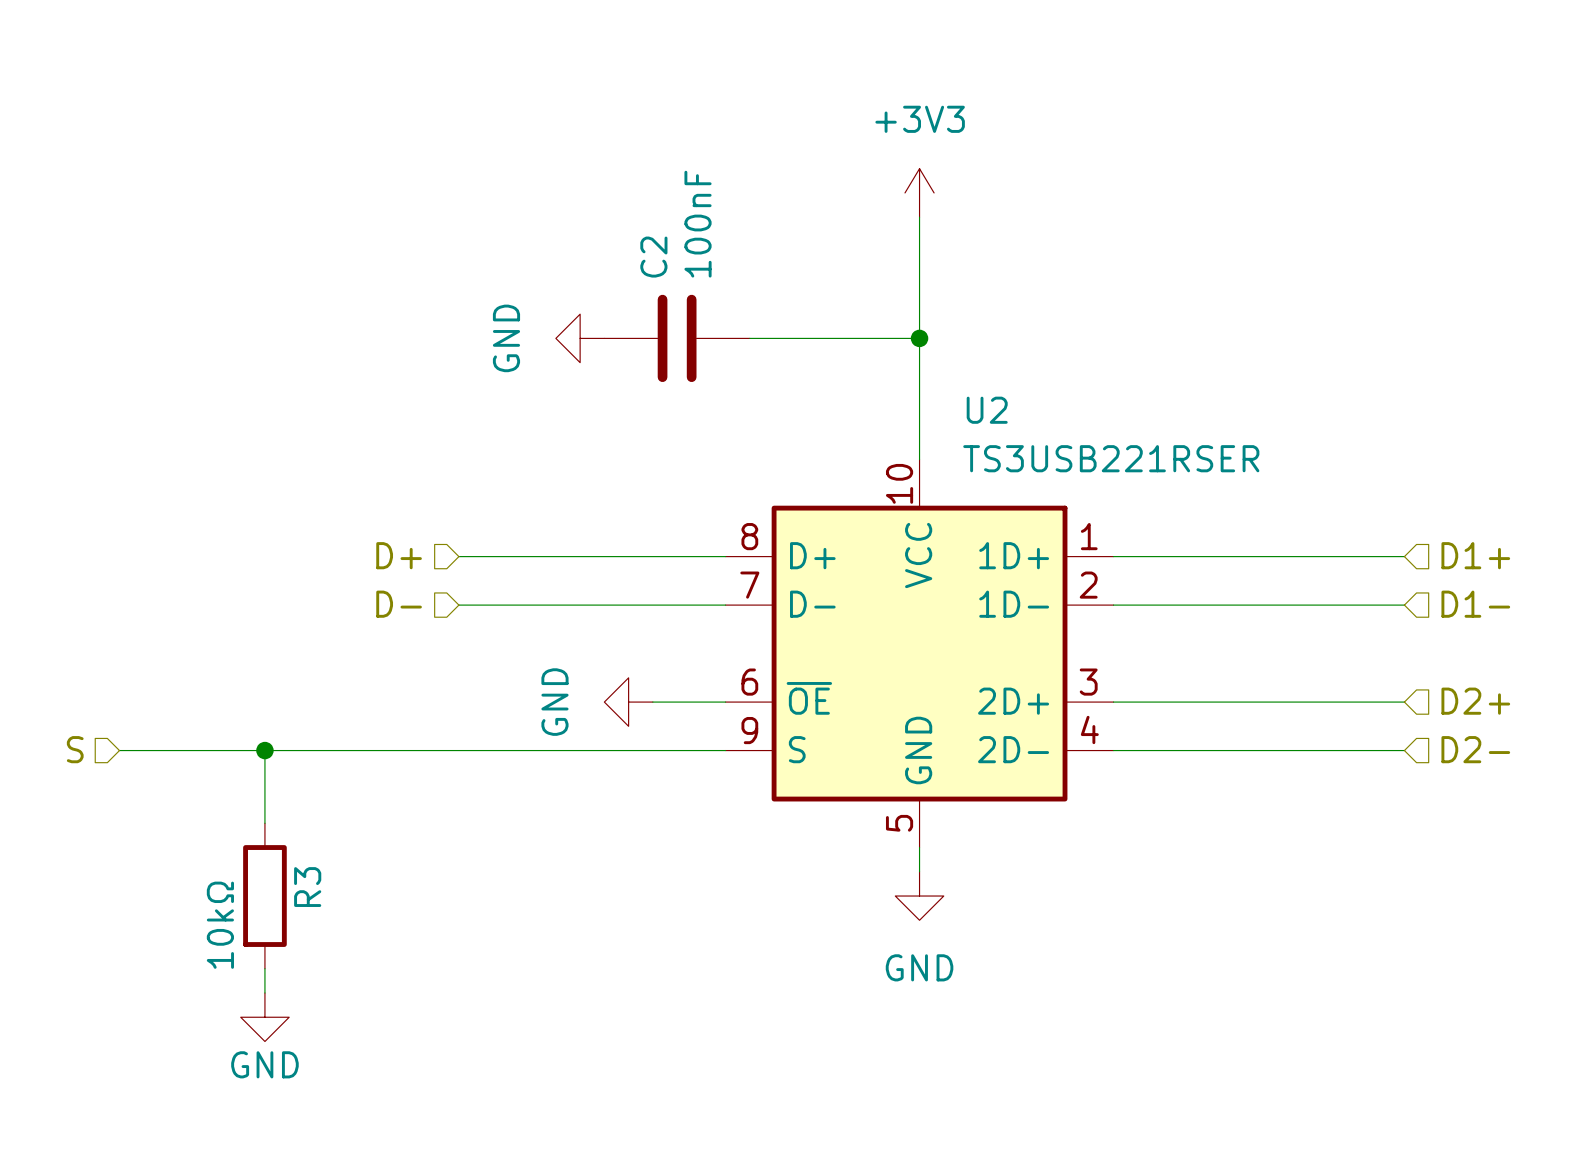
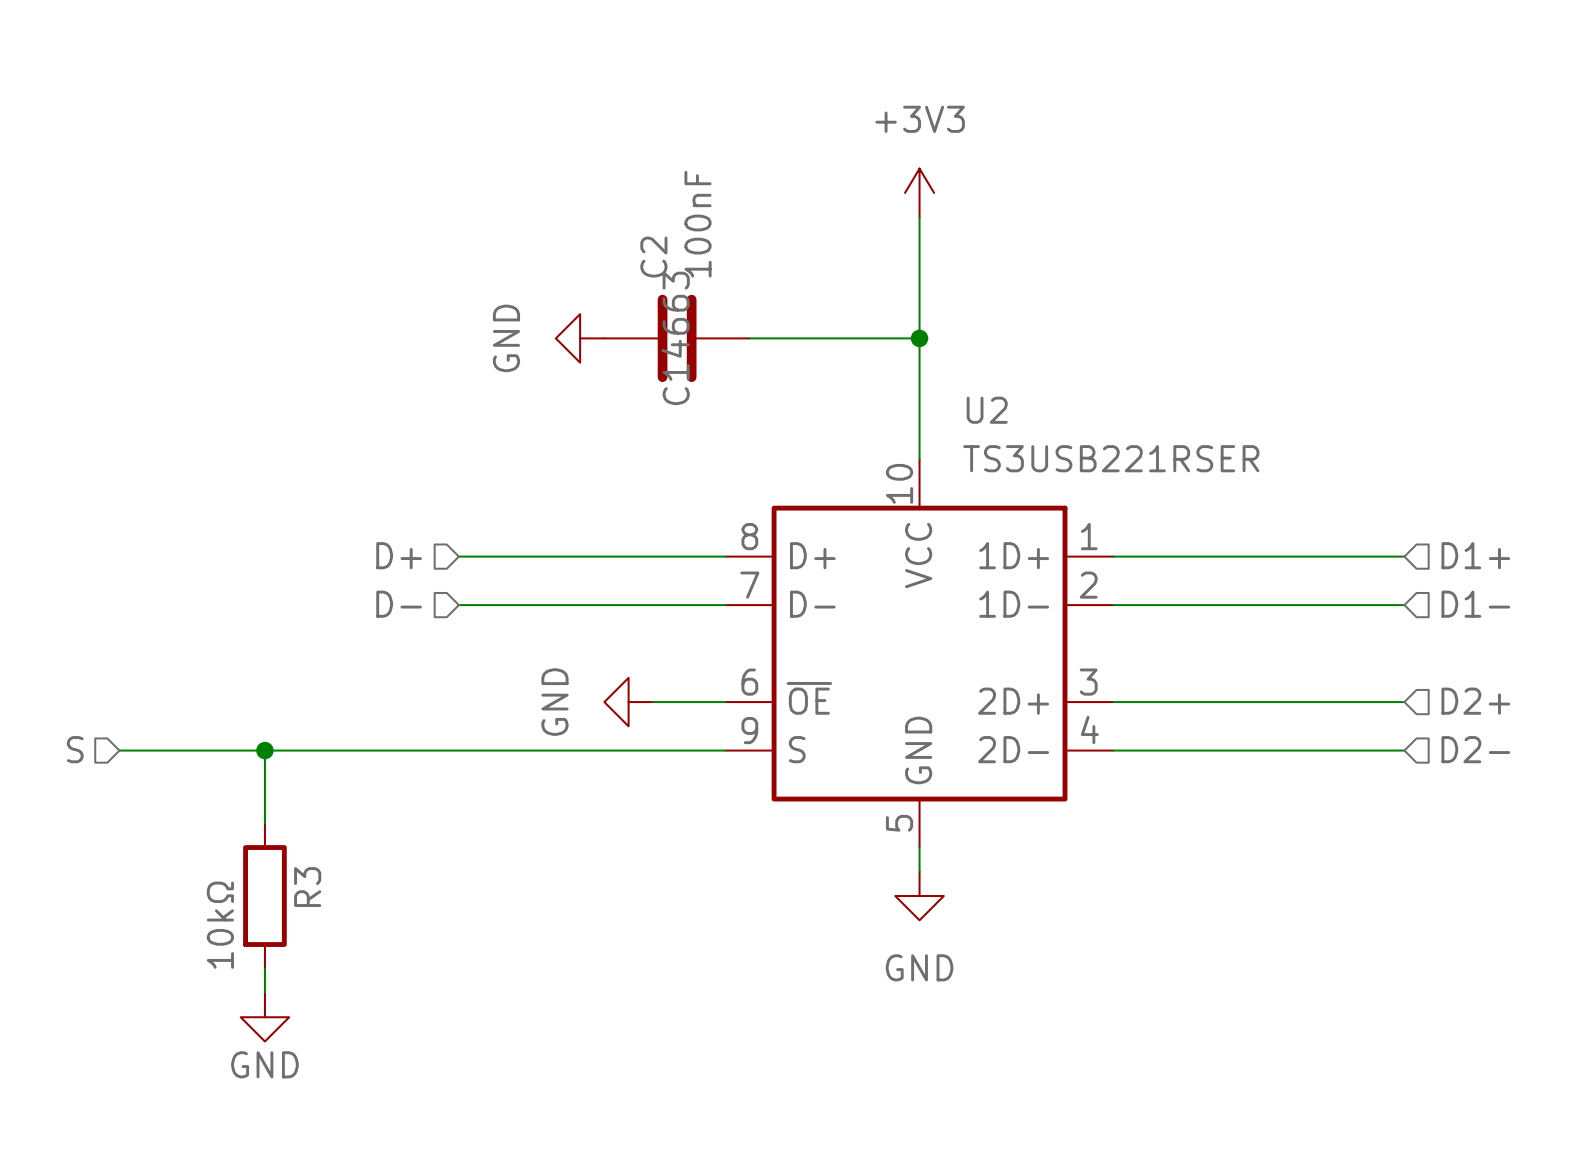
C2 text: none -> C14663 (675, 338)

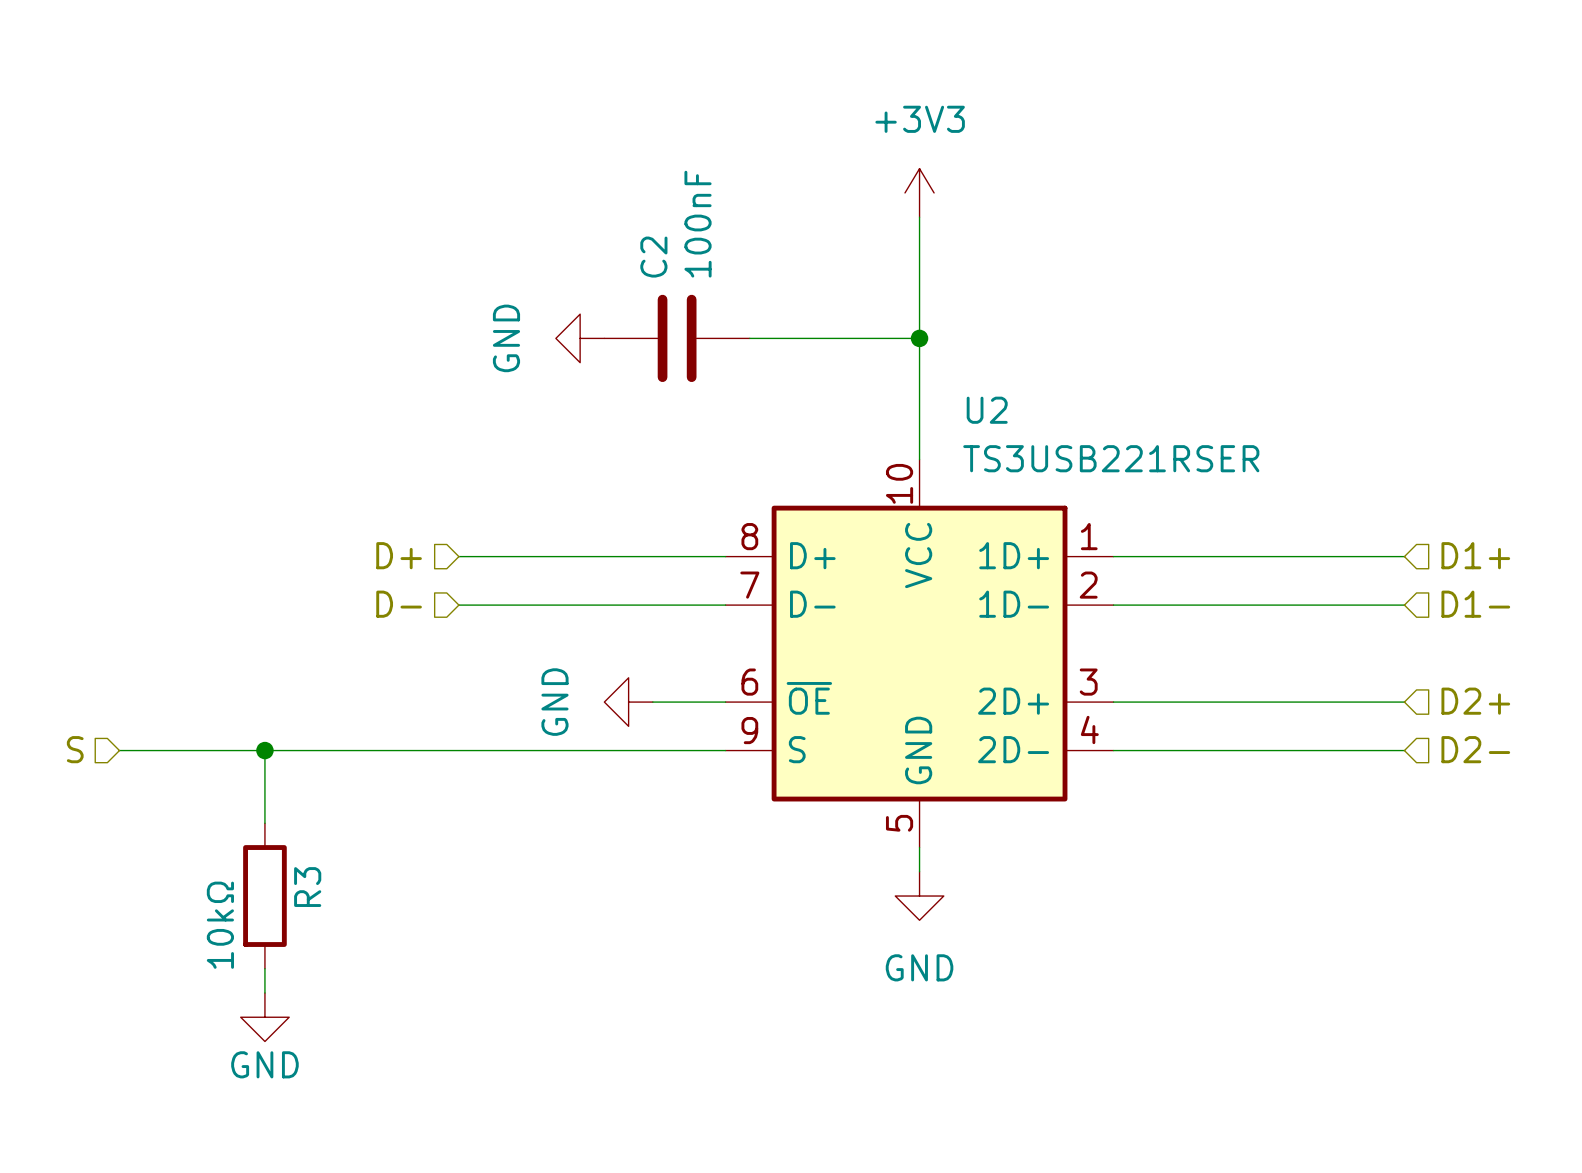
C2 text: C14663 (675, 338) -> none

